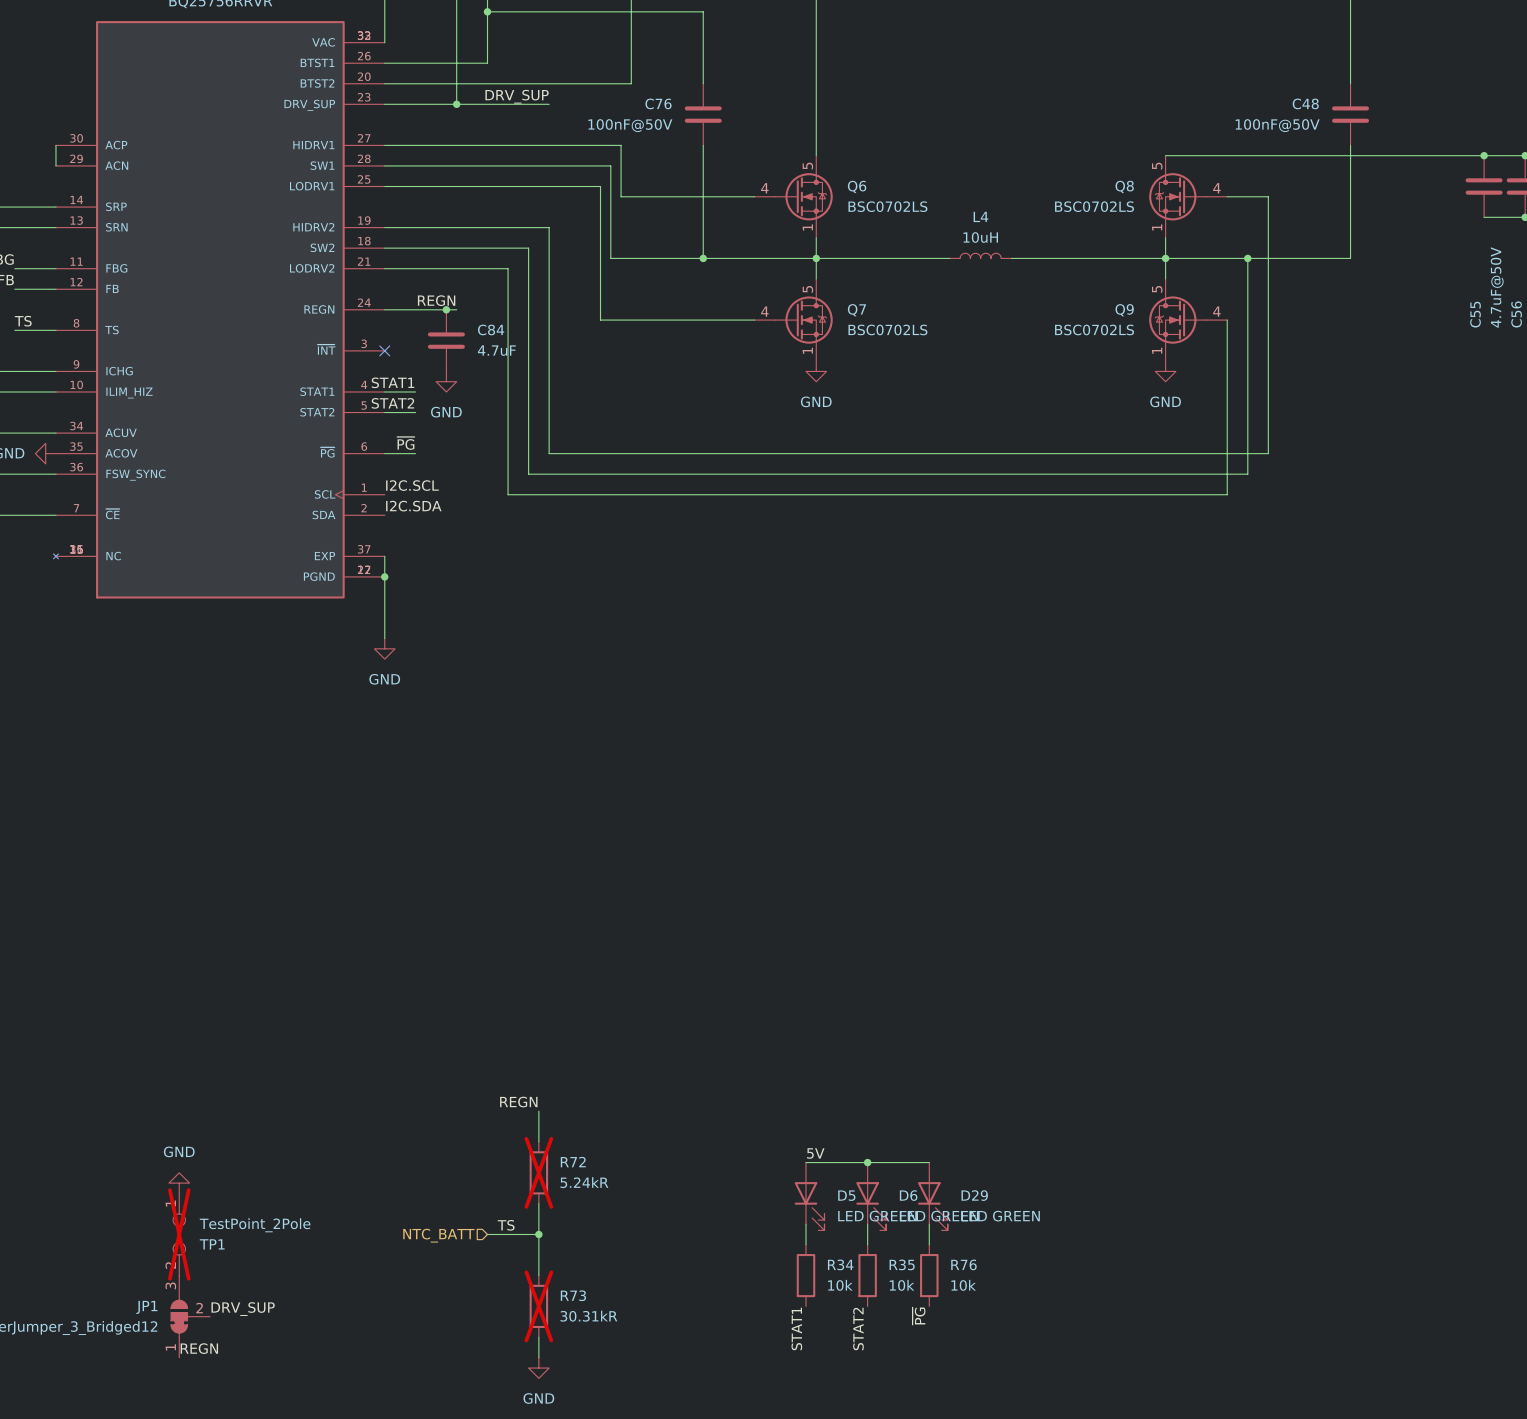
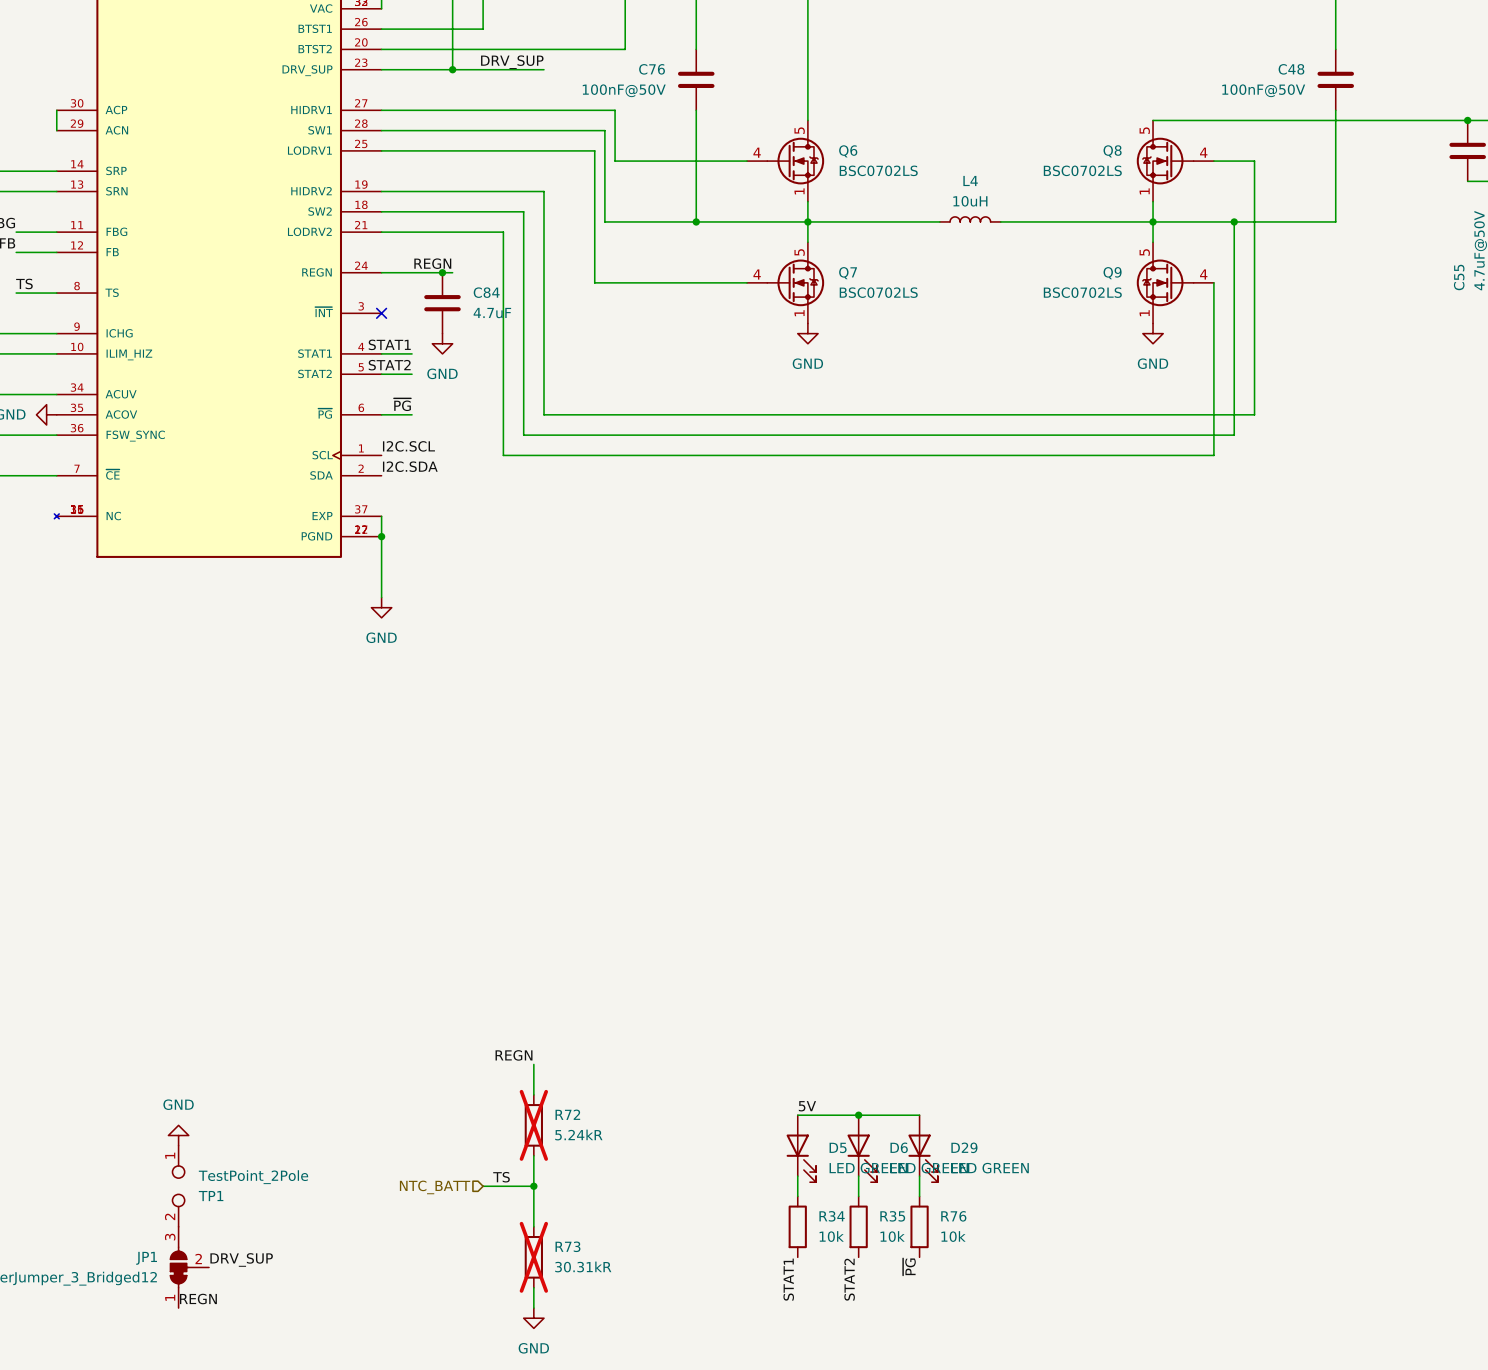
TP1 do-not-place cross: (179, 1234) -> none

